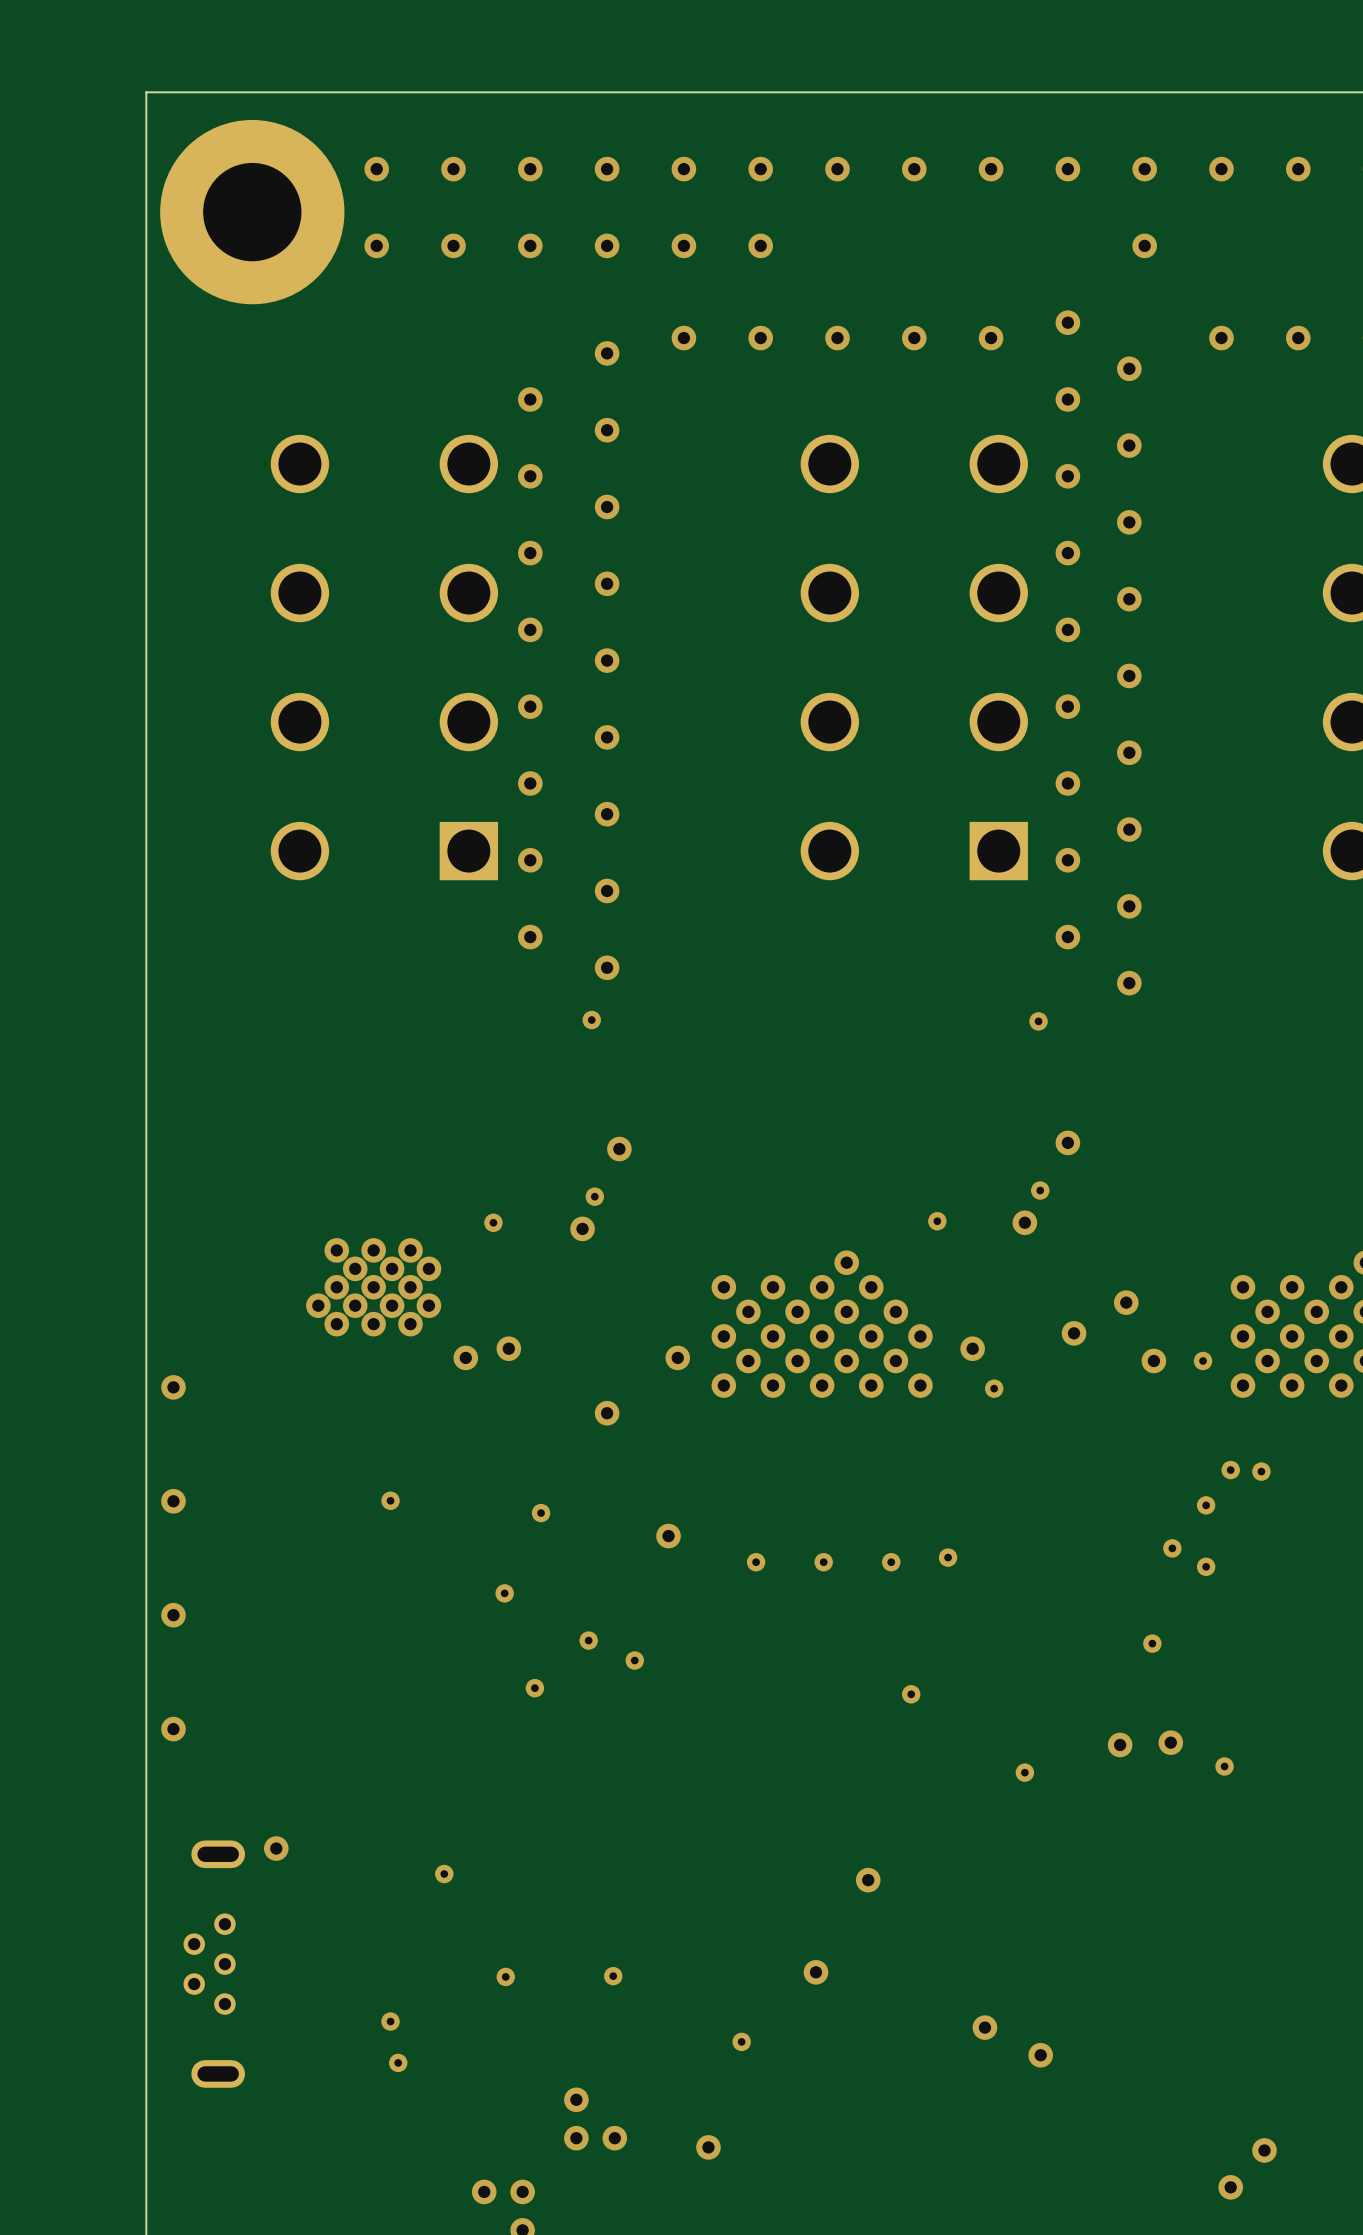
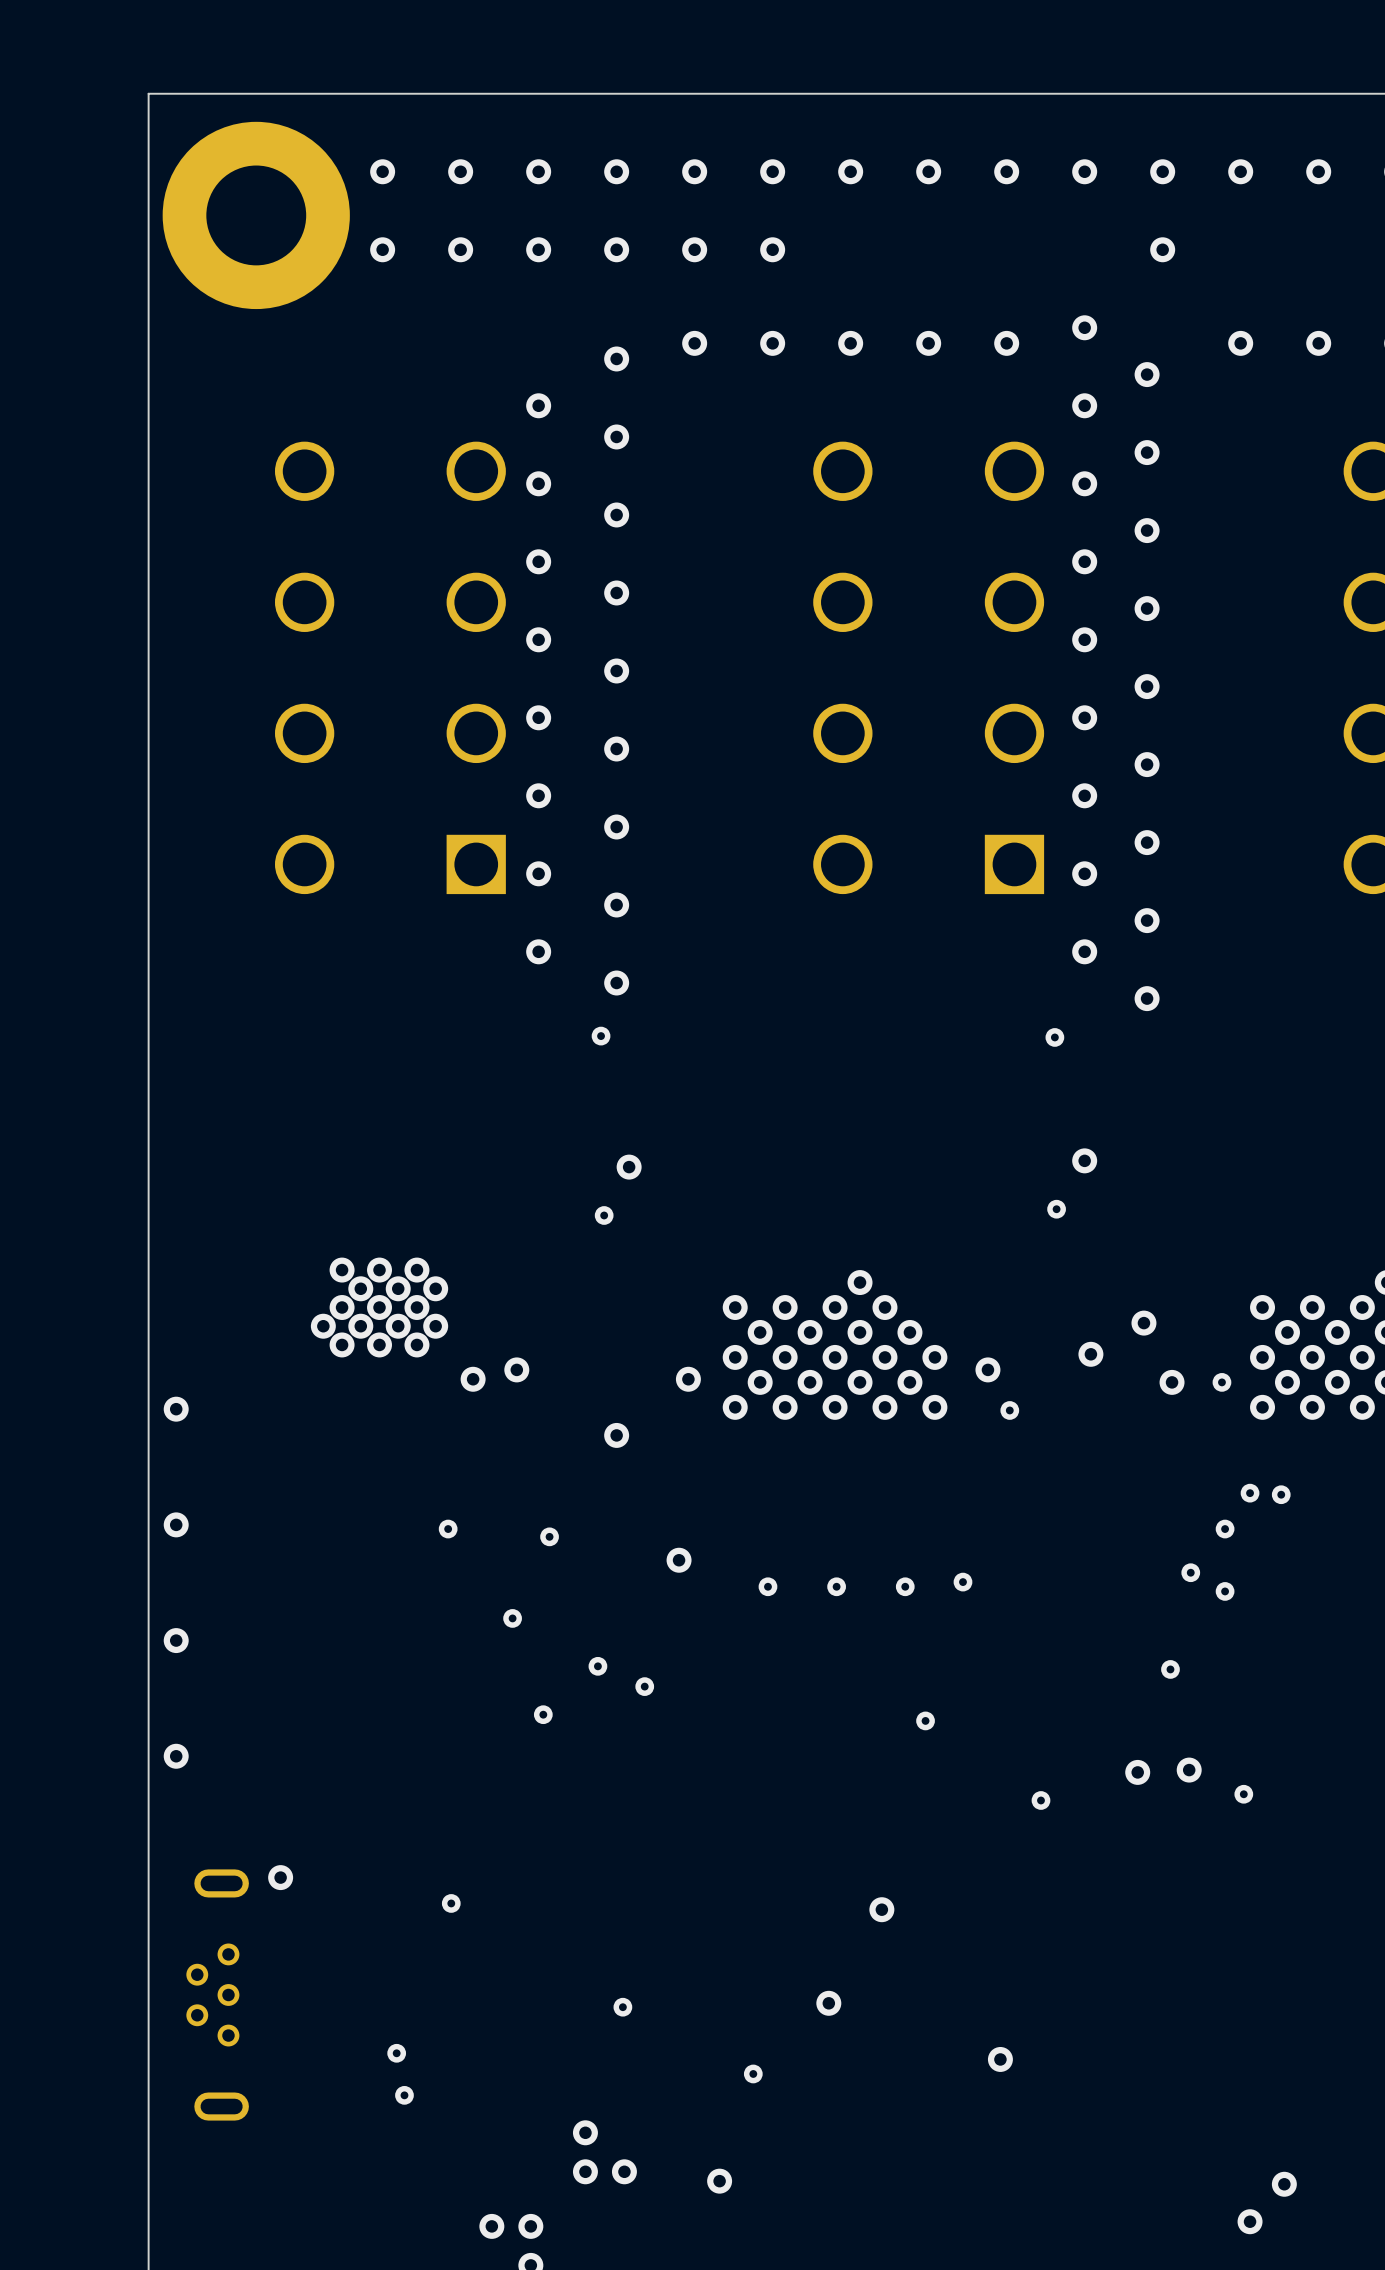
via: (937, 1221) -> none
via: (493, 1222) -> none
via: (1024, 1222) -> none
via: (582, 1228) -> none
via position: (390, 1500) -> (448, 1529)
via: (505, 1976) -> none
via: (1040, 2055) -> none

